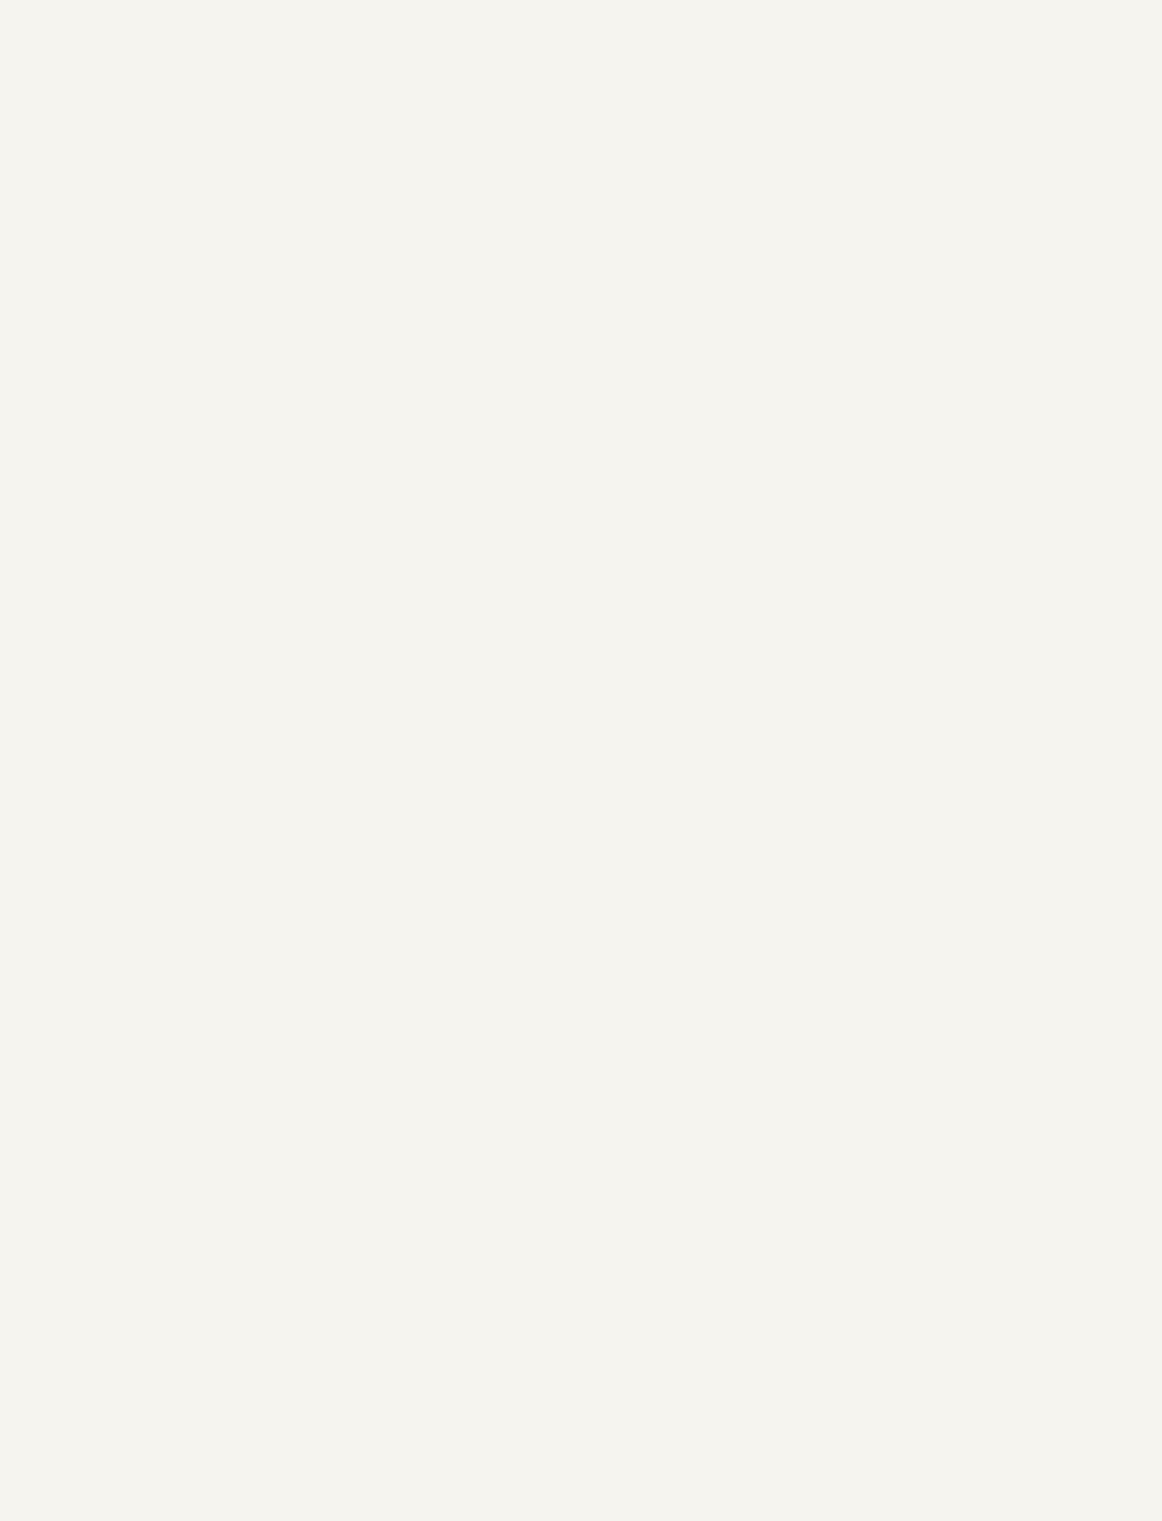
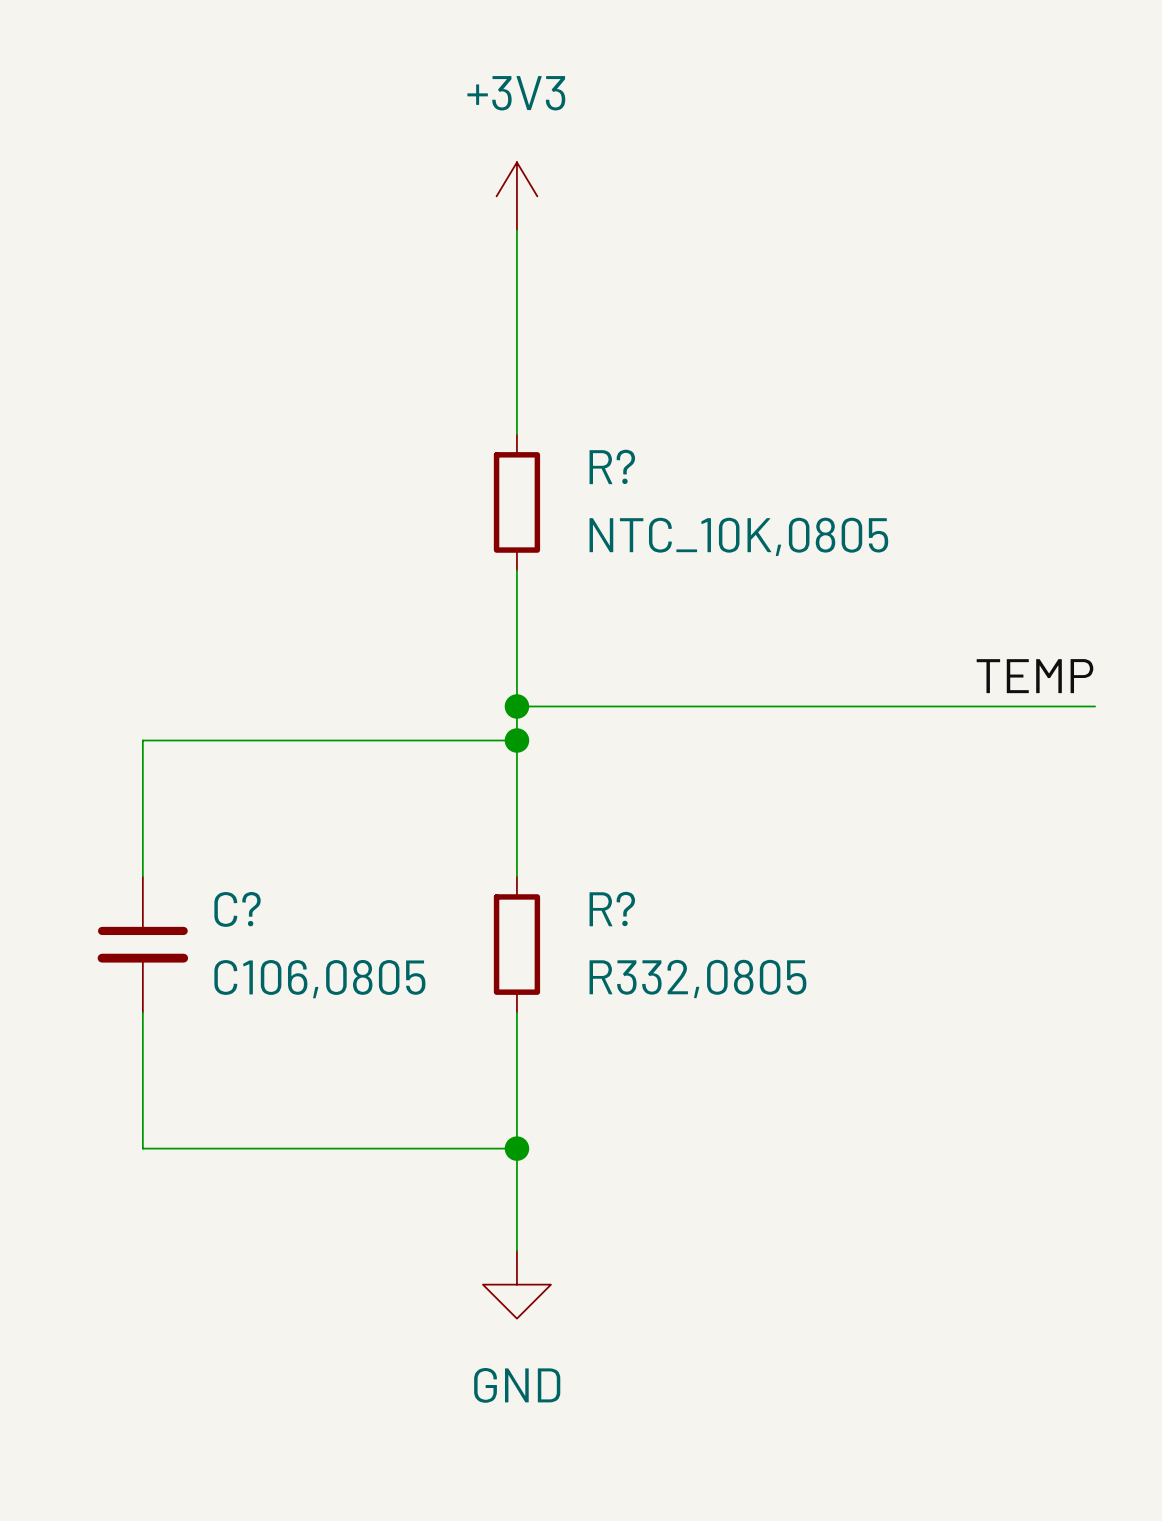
power symbol: none -> +3V3 (516, 196)
wire: none -> (516, 230) (516, 434)
R?: none -> NTC_10K,0805 (516, 502)
wire: none -> (516, 570) (516, 876)
label: none -> TEMP (1034, 676)
wire: none -> (516, 706) (1095, 706)
junction: none -> (516, 706)
wire: none -> (516, 740) (142, 740) (142, 876)
junction: none -> (516, 740)
C?: none -> C106,0805 (142, 944)
R?: none -> R332,0805 (516, 944)
wire: none -> (142, 1012) (142, 1148) (516, 1148)
wire: none -> (516, 1012) (516, 1250)
junction: none -> (516, 1148)
power symbol: none -> GND (516, 1284)

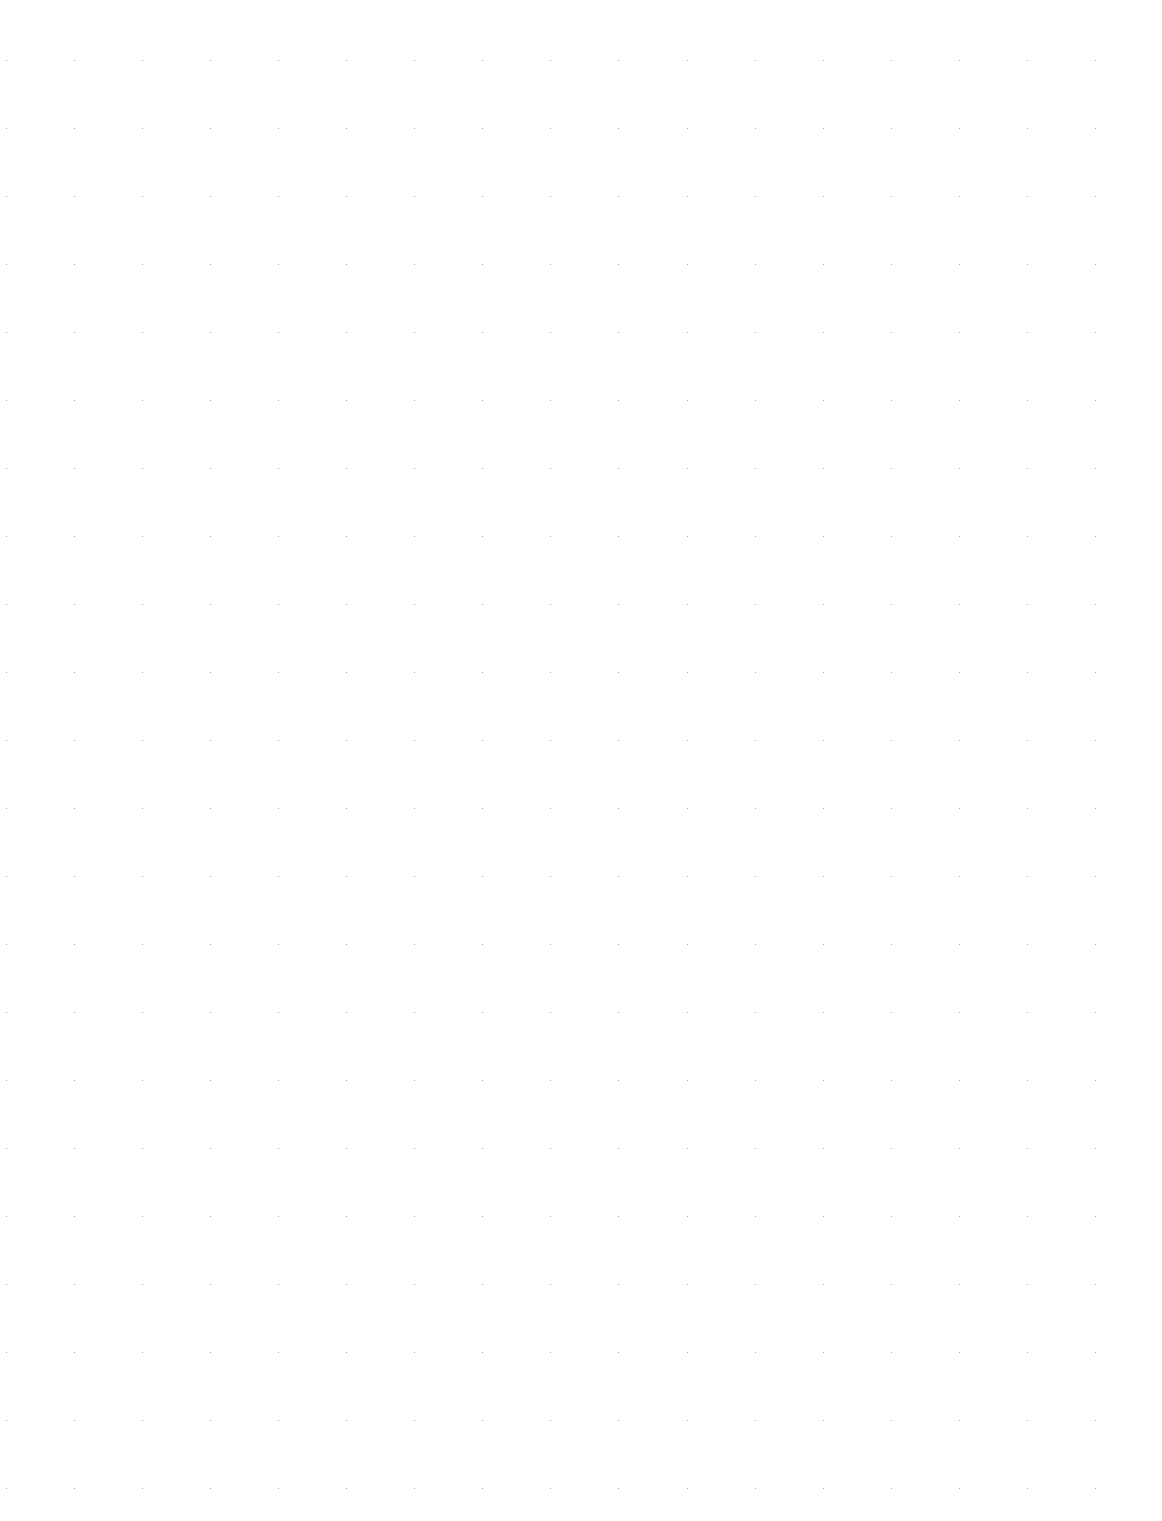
power symbol: +3V3 (516, 196) -> none
wire: (516, 230) (516, 434) -> none
R?: NTC_10K,0805 (516, 502) -> none
wire: (516, 570) (516, 876) -> none
label: TEMP (1034, 676) -> none
wire: (516, 706) (1095, 706) -> none
junction: (516, 706) -> none
wire: (516, 740) (142, 740) (142, 876) -> none
junction: (516, 740) -> none
C?: C106,0805 (142, 944) -> none
R?: R332,0805 (516, 944) -> none
wire: (142, 1012) (142, 1148) (516, 1148) -> none
wire: (516, 1012) (516, 1250) -> none
junction: (516, 1148) -> none
power symbol: GND (516, 1284) -> none

